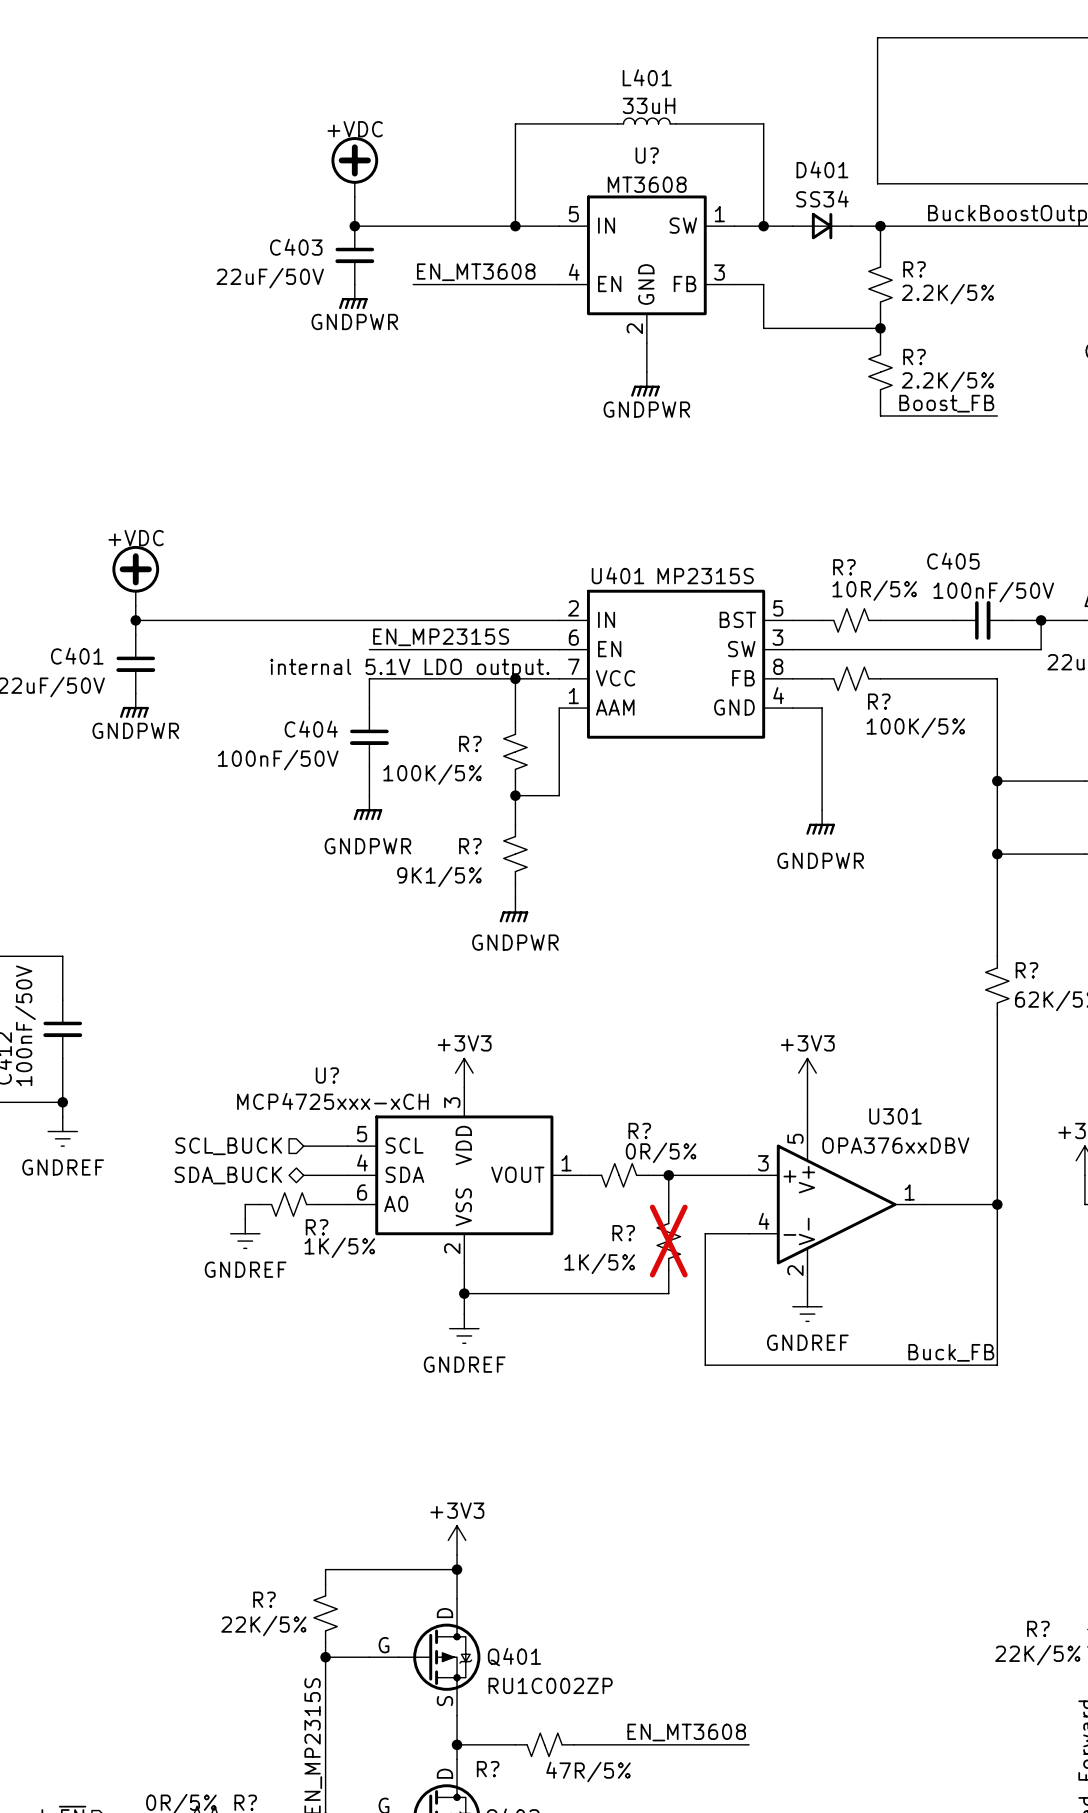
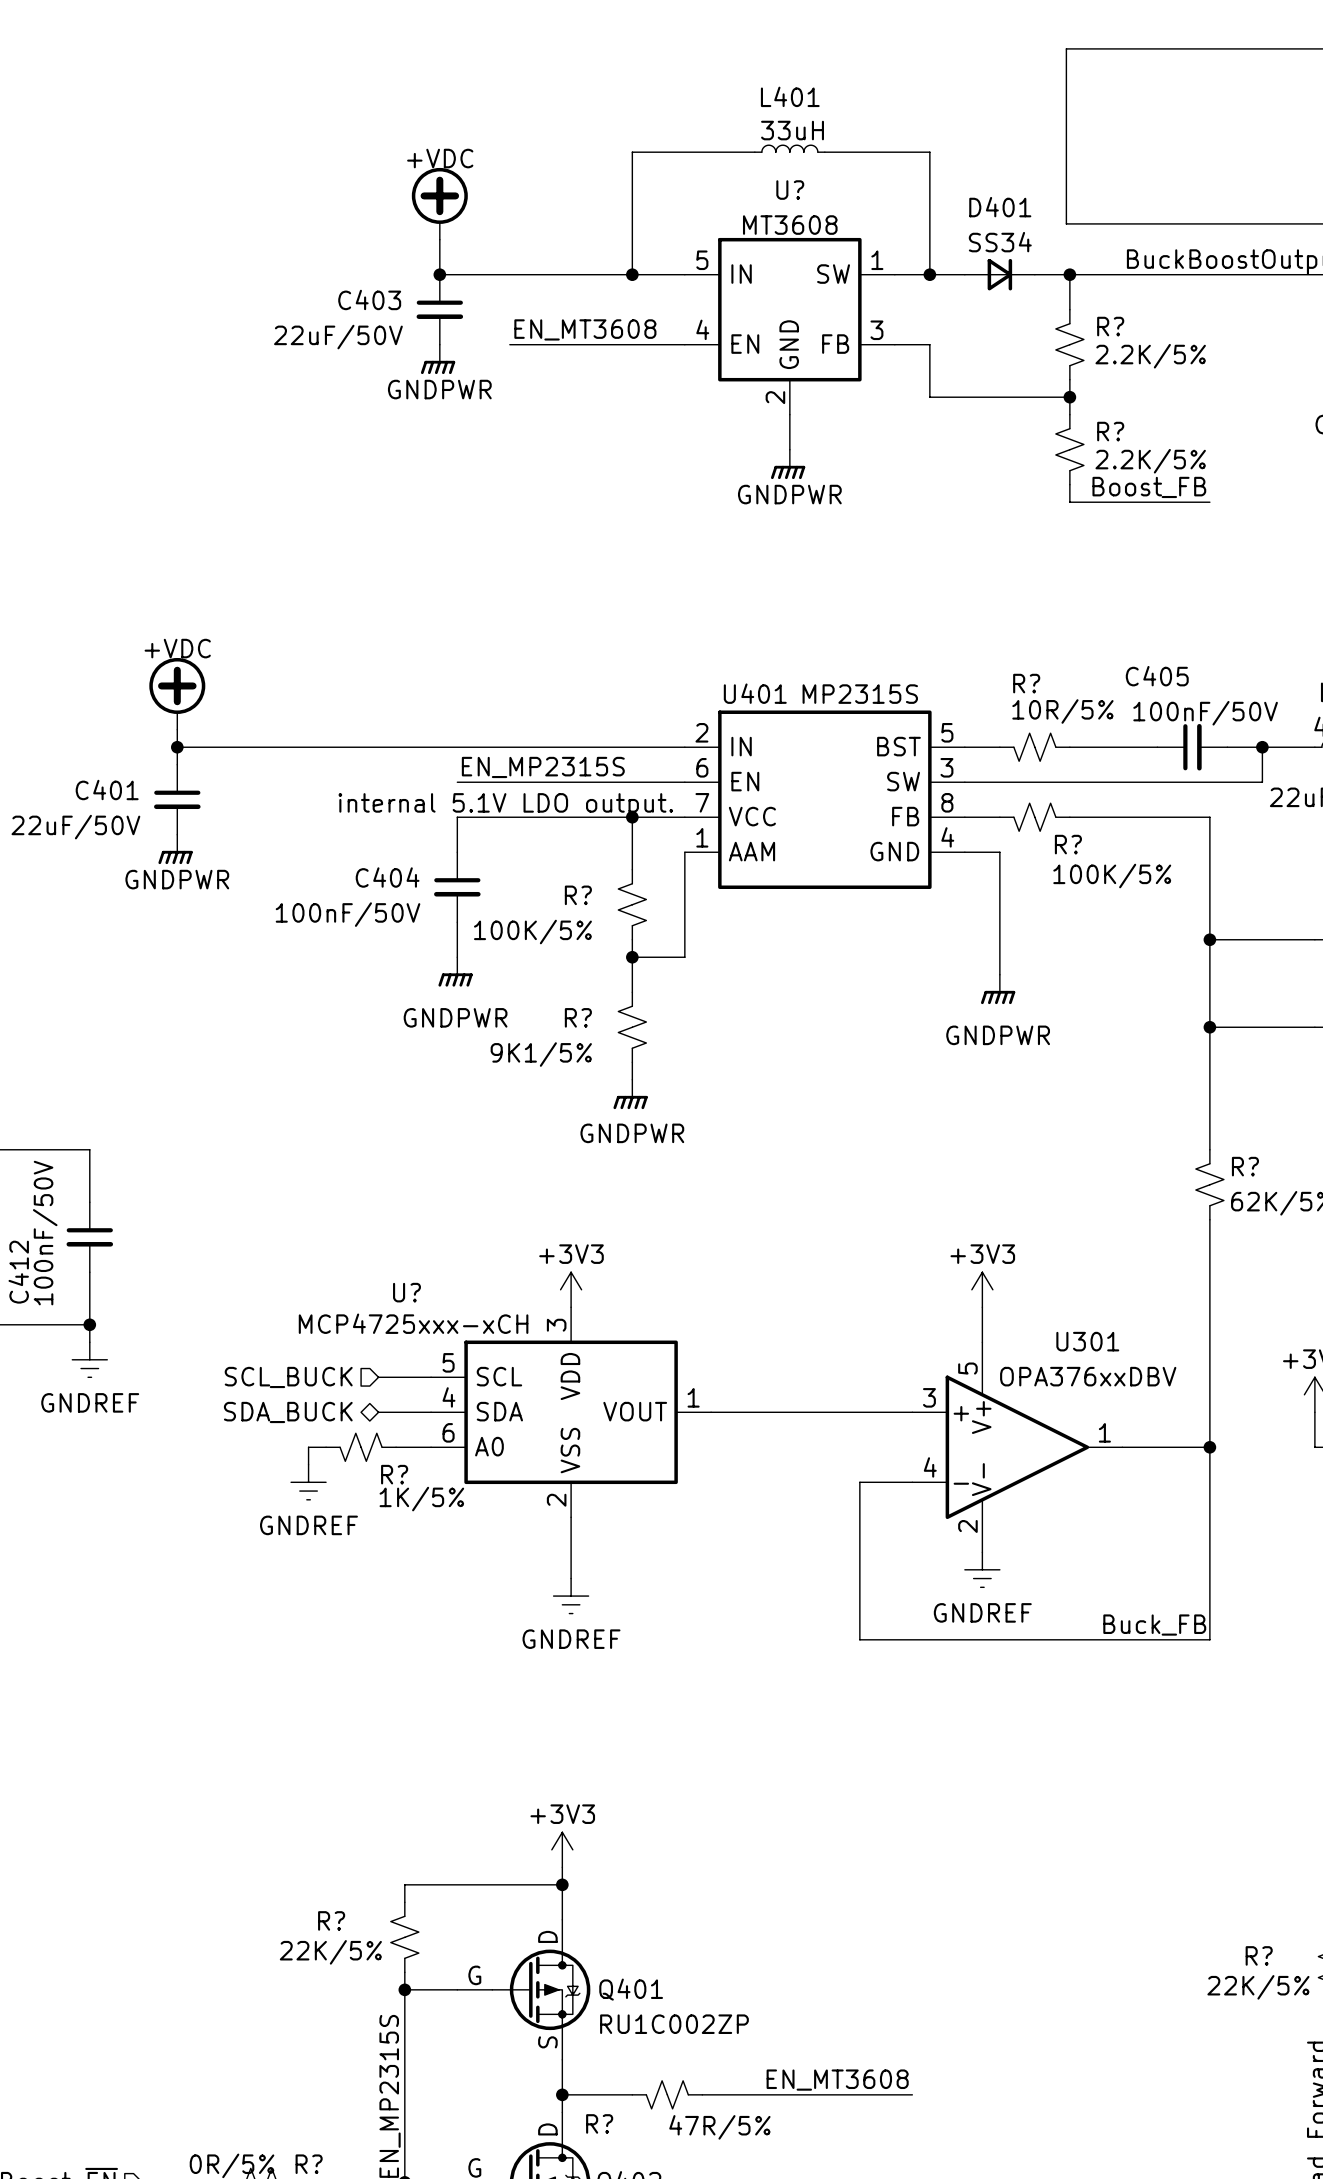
wire: none -> (721, 1412) (791, 1412)
R?: 0R/5% (619, 1175) -> none
wire: (668, 1175) (668, 1211) -> none
junction: (668, 1175) -> none
R?: 1K/5% (668, 1241) -> none
wire: (668, 1270) (668, 1293) (464, 1293) -> none
junction: (464, 1293) -> none

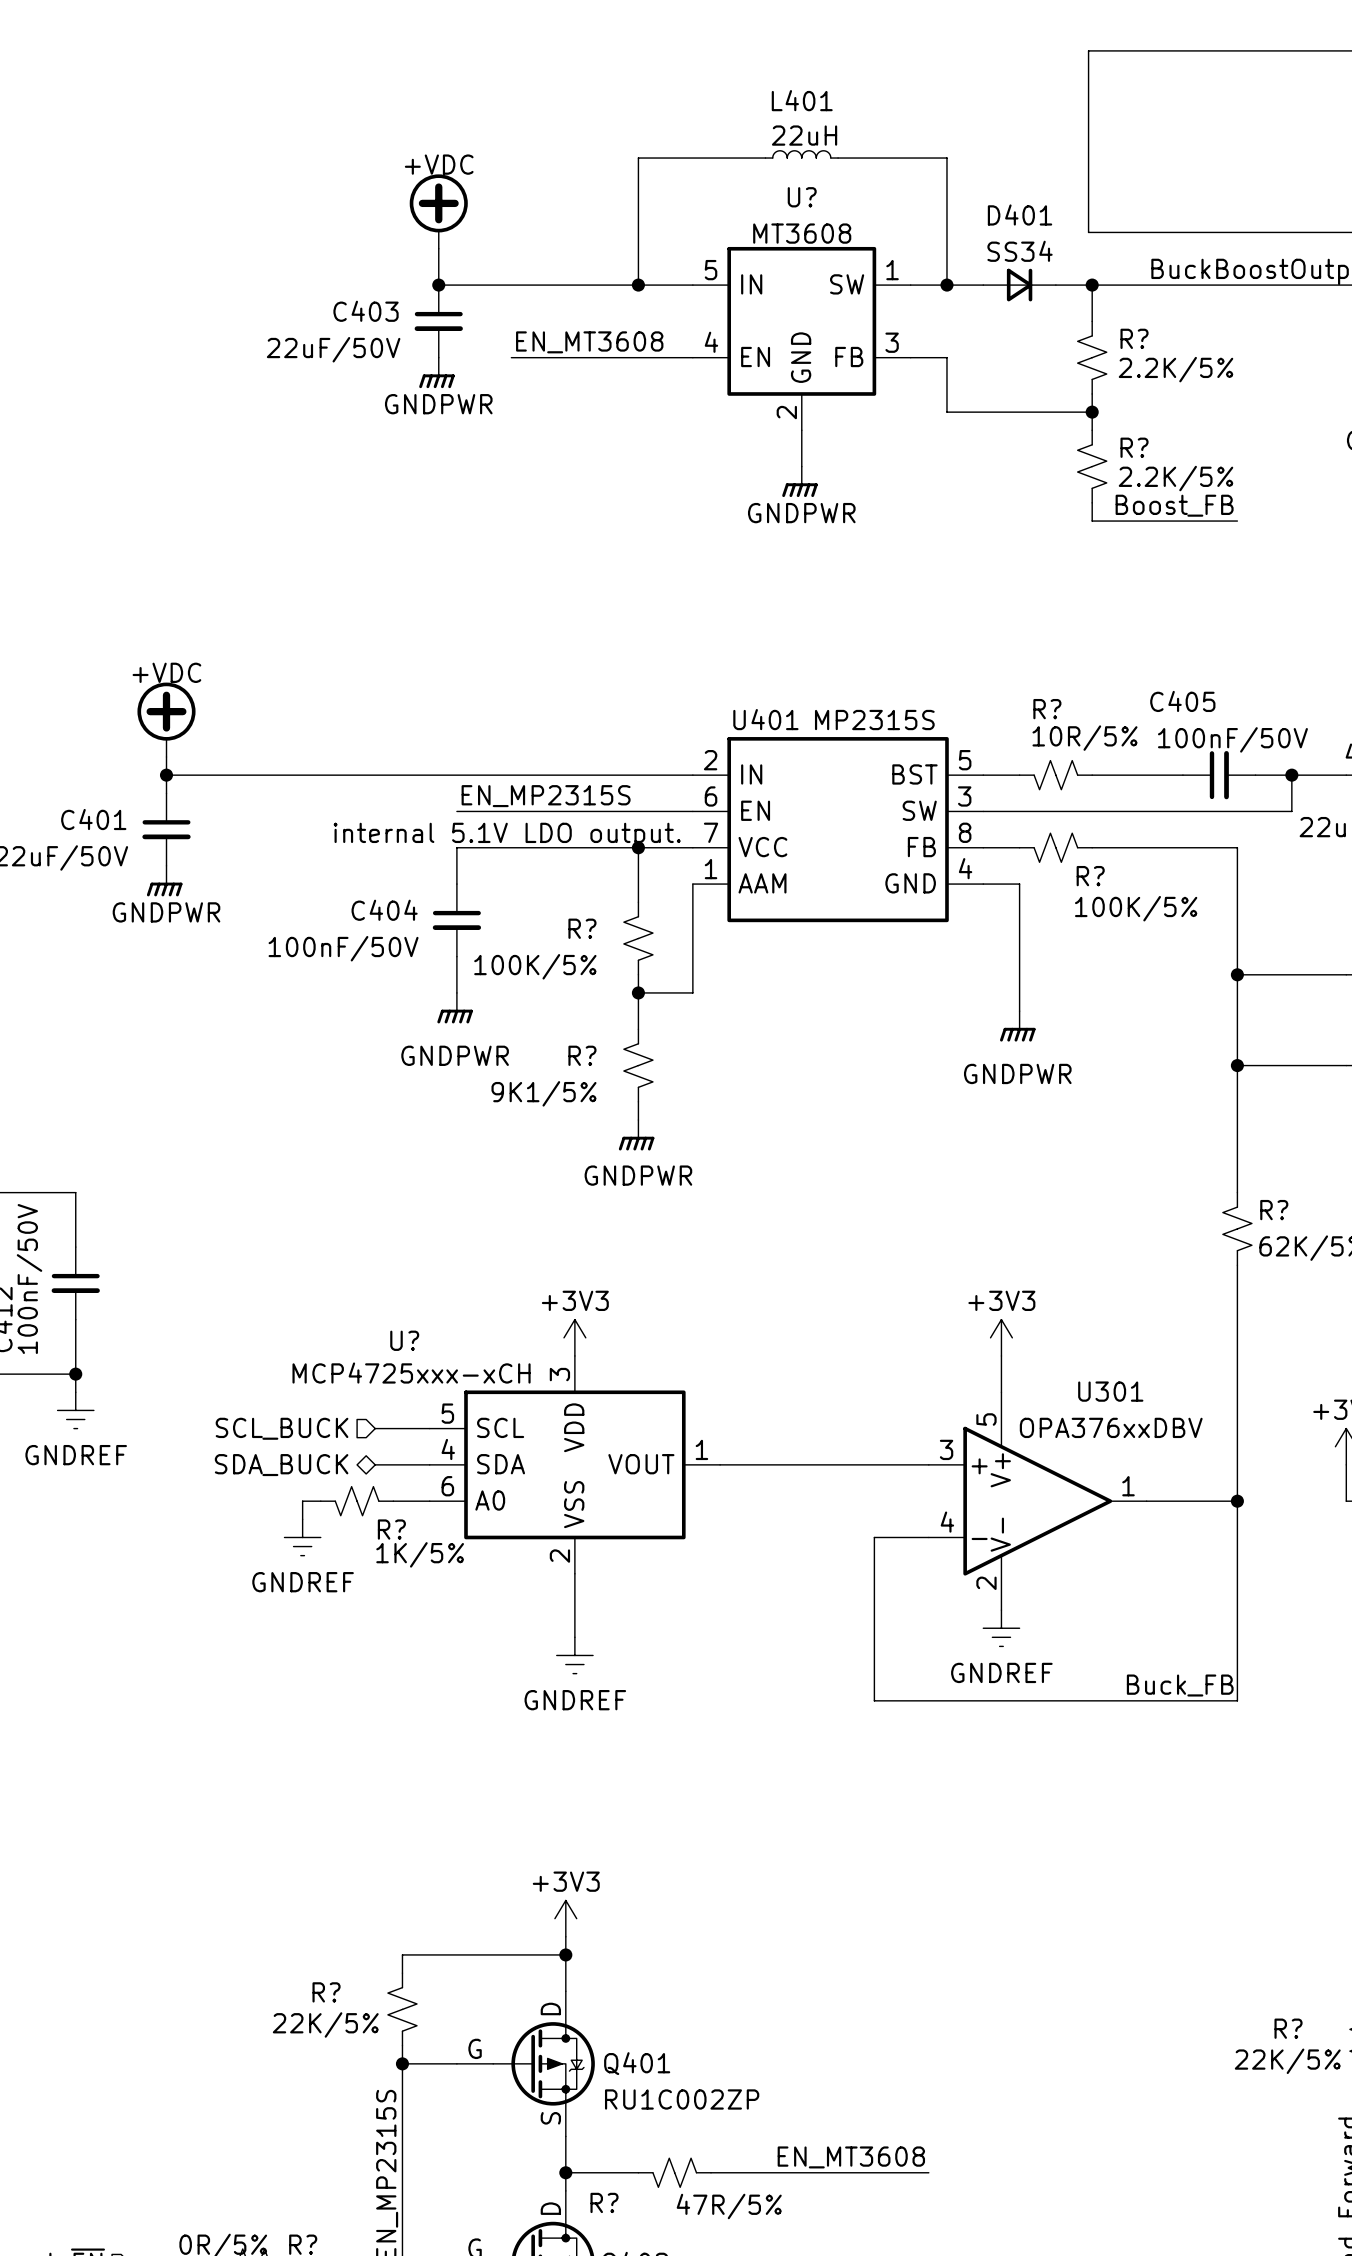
L401 value: 33uH (792, 130) -> 22uH (804, 135)

